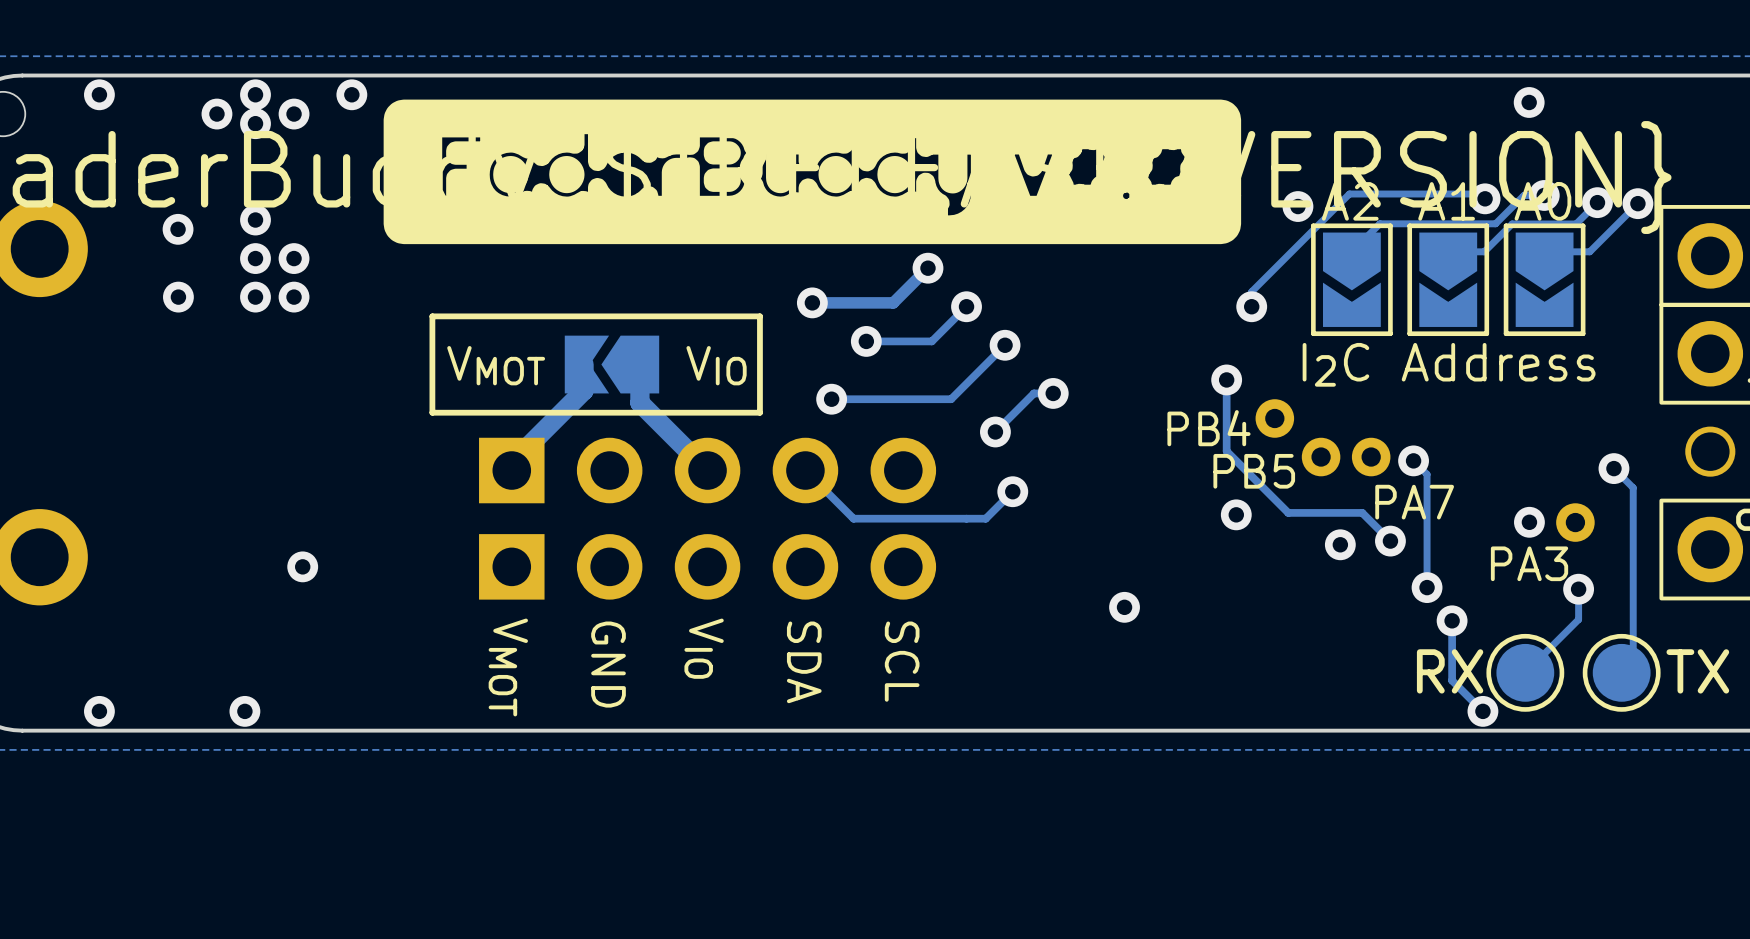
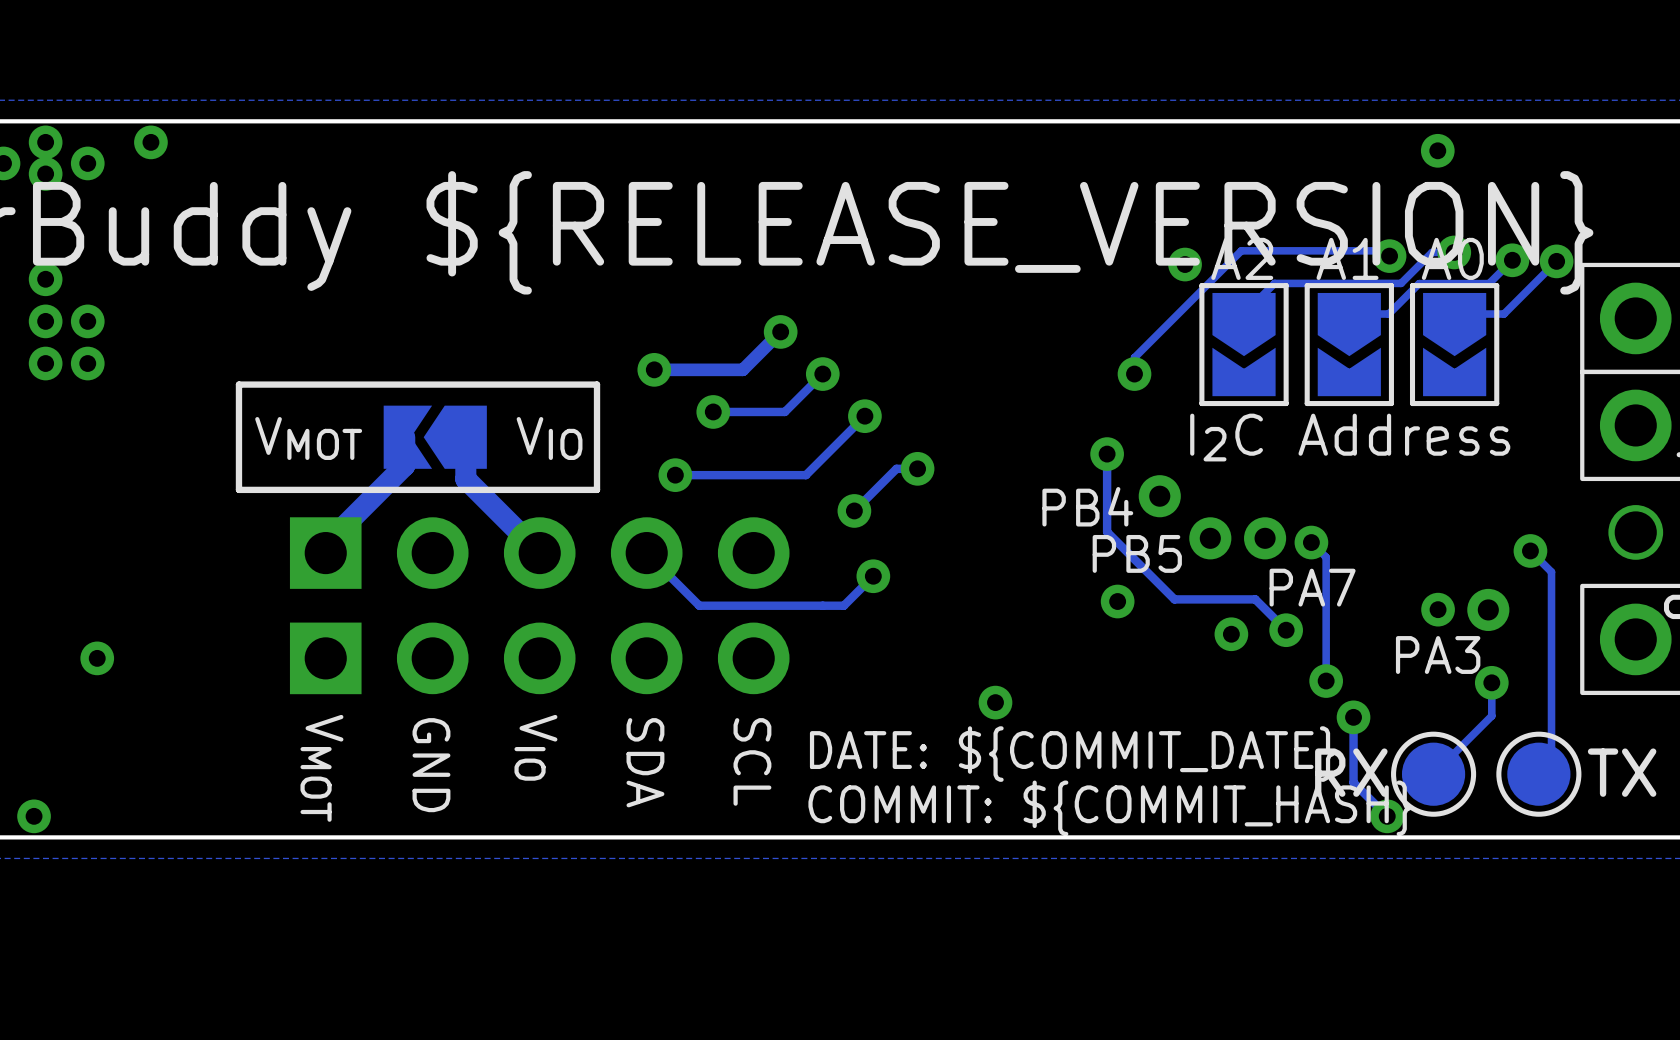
drawing: [383, 99, 1242, 245] -> none
text: none -> DATE: ${COMMIT_DATE} (1072, 754)
text: none -> COMMIT: ${COMMIT_HASH} (1109, 808)

